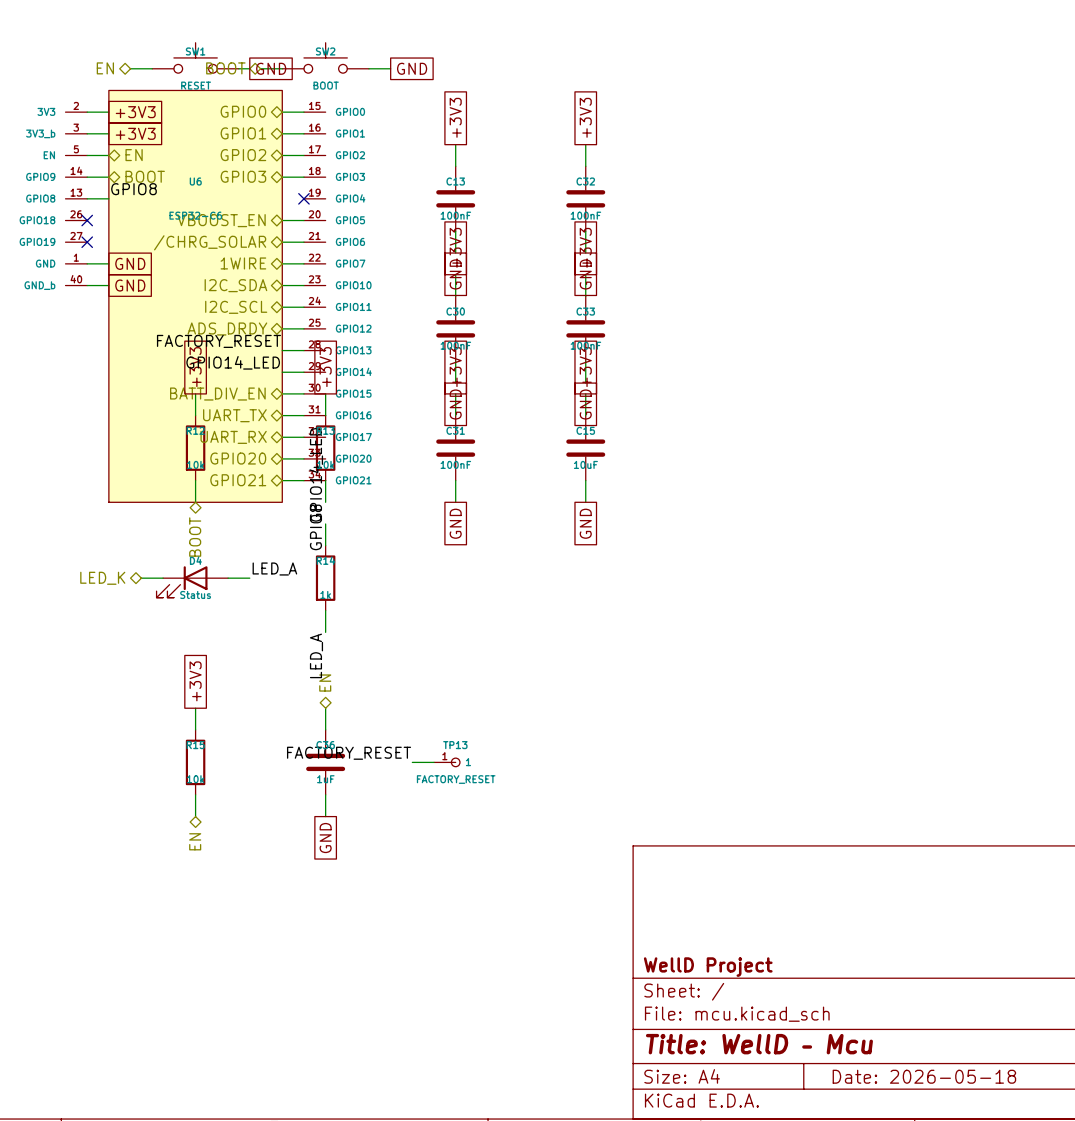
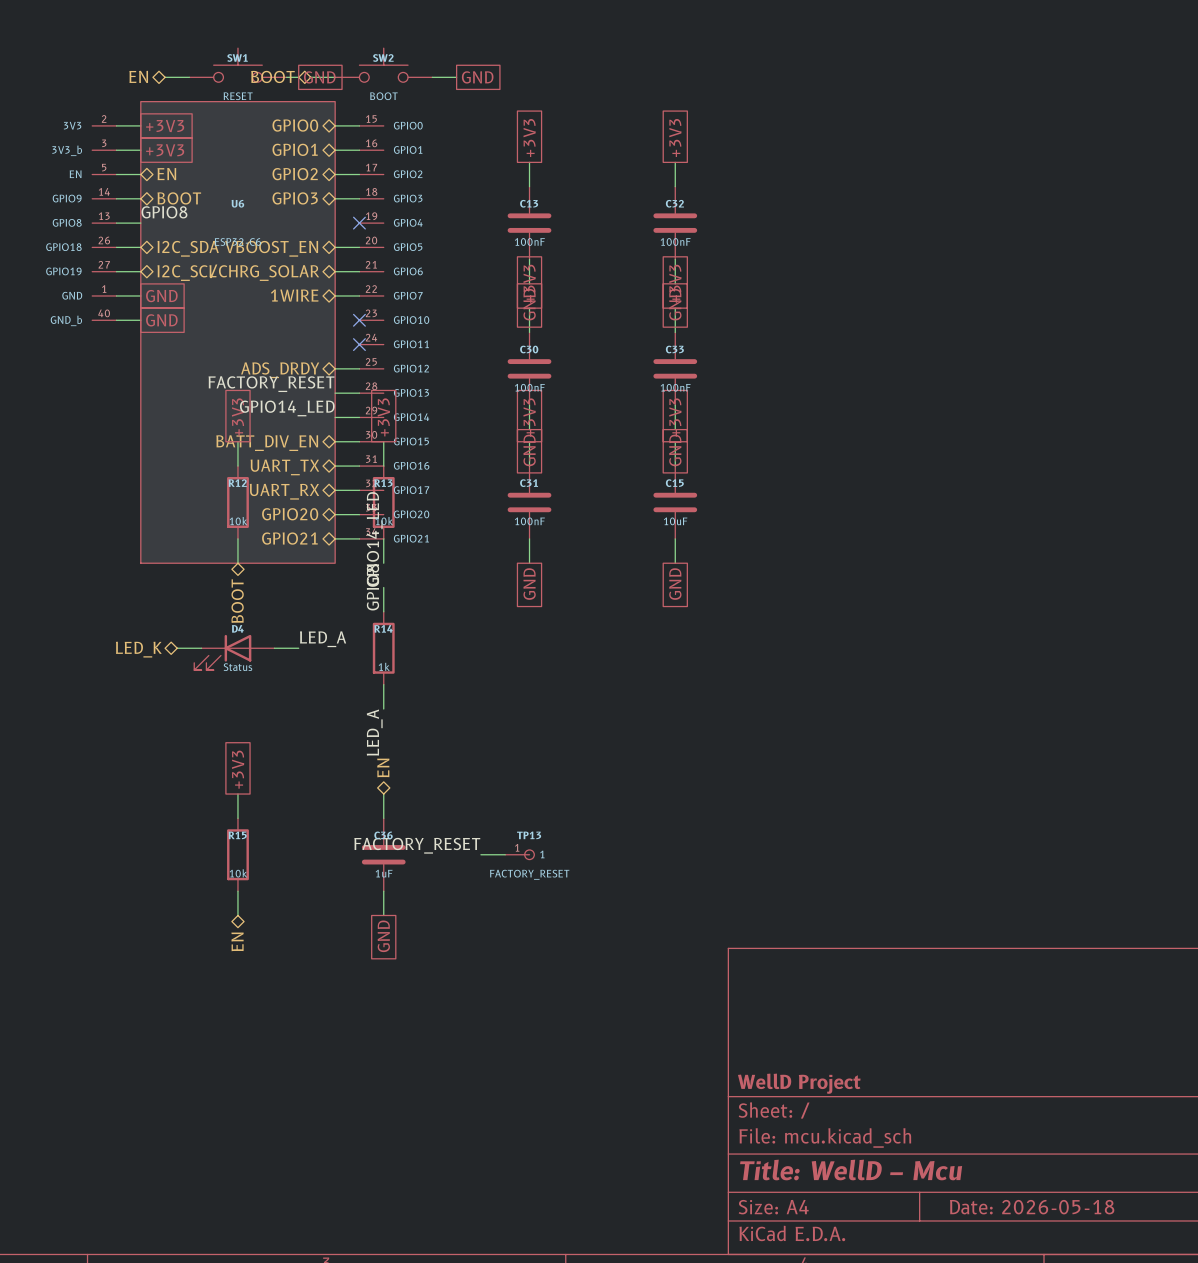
wire: none -> (116, 247) (140, 247)
no-connect mark: (87, 220) -> none
no-connect mark: (87, 242) -> none
hierarchical label rotation: 0° (235, 285) -> 180° (188, 248)
hierarchical label position: I2C_SDA (235, 285) -> I2C_SDA (188, 248)
wire: (282, 285) (303, 285) -> (116, 271) (140, 271)
no-connect mark: none -> (359, 320)
hierarchical label rotation: 0° (236, 307) -> 180° (186, 273)
hierarchical label position: I2C_SCL (236, 307) -> I2C_SCL (186, 273)
wire: (282, 307) (303, 307) -> none
no-connect mark: none -> (359, 344)

